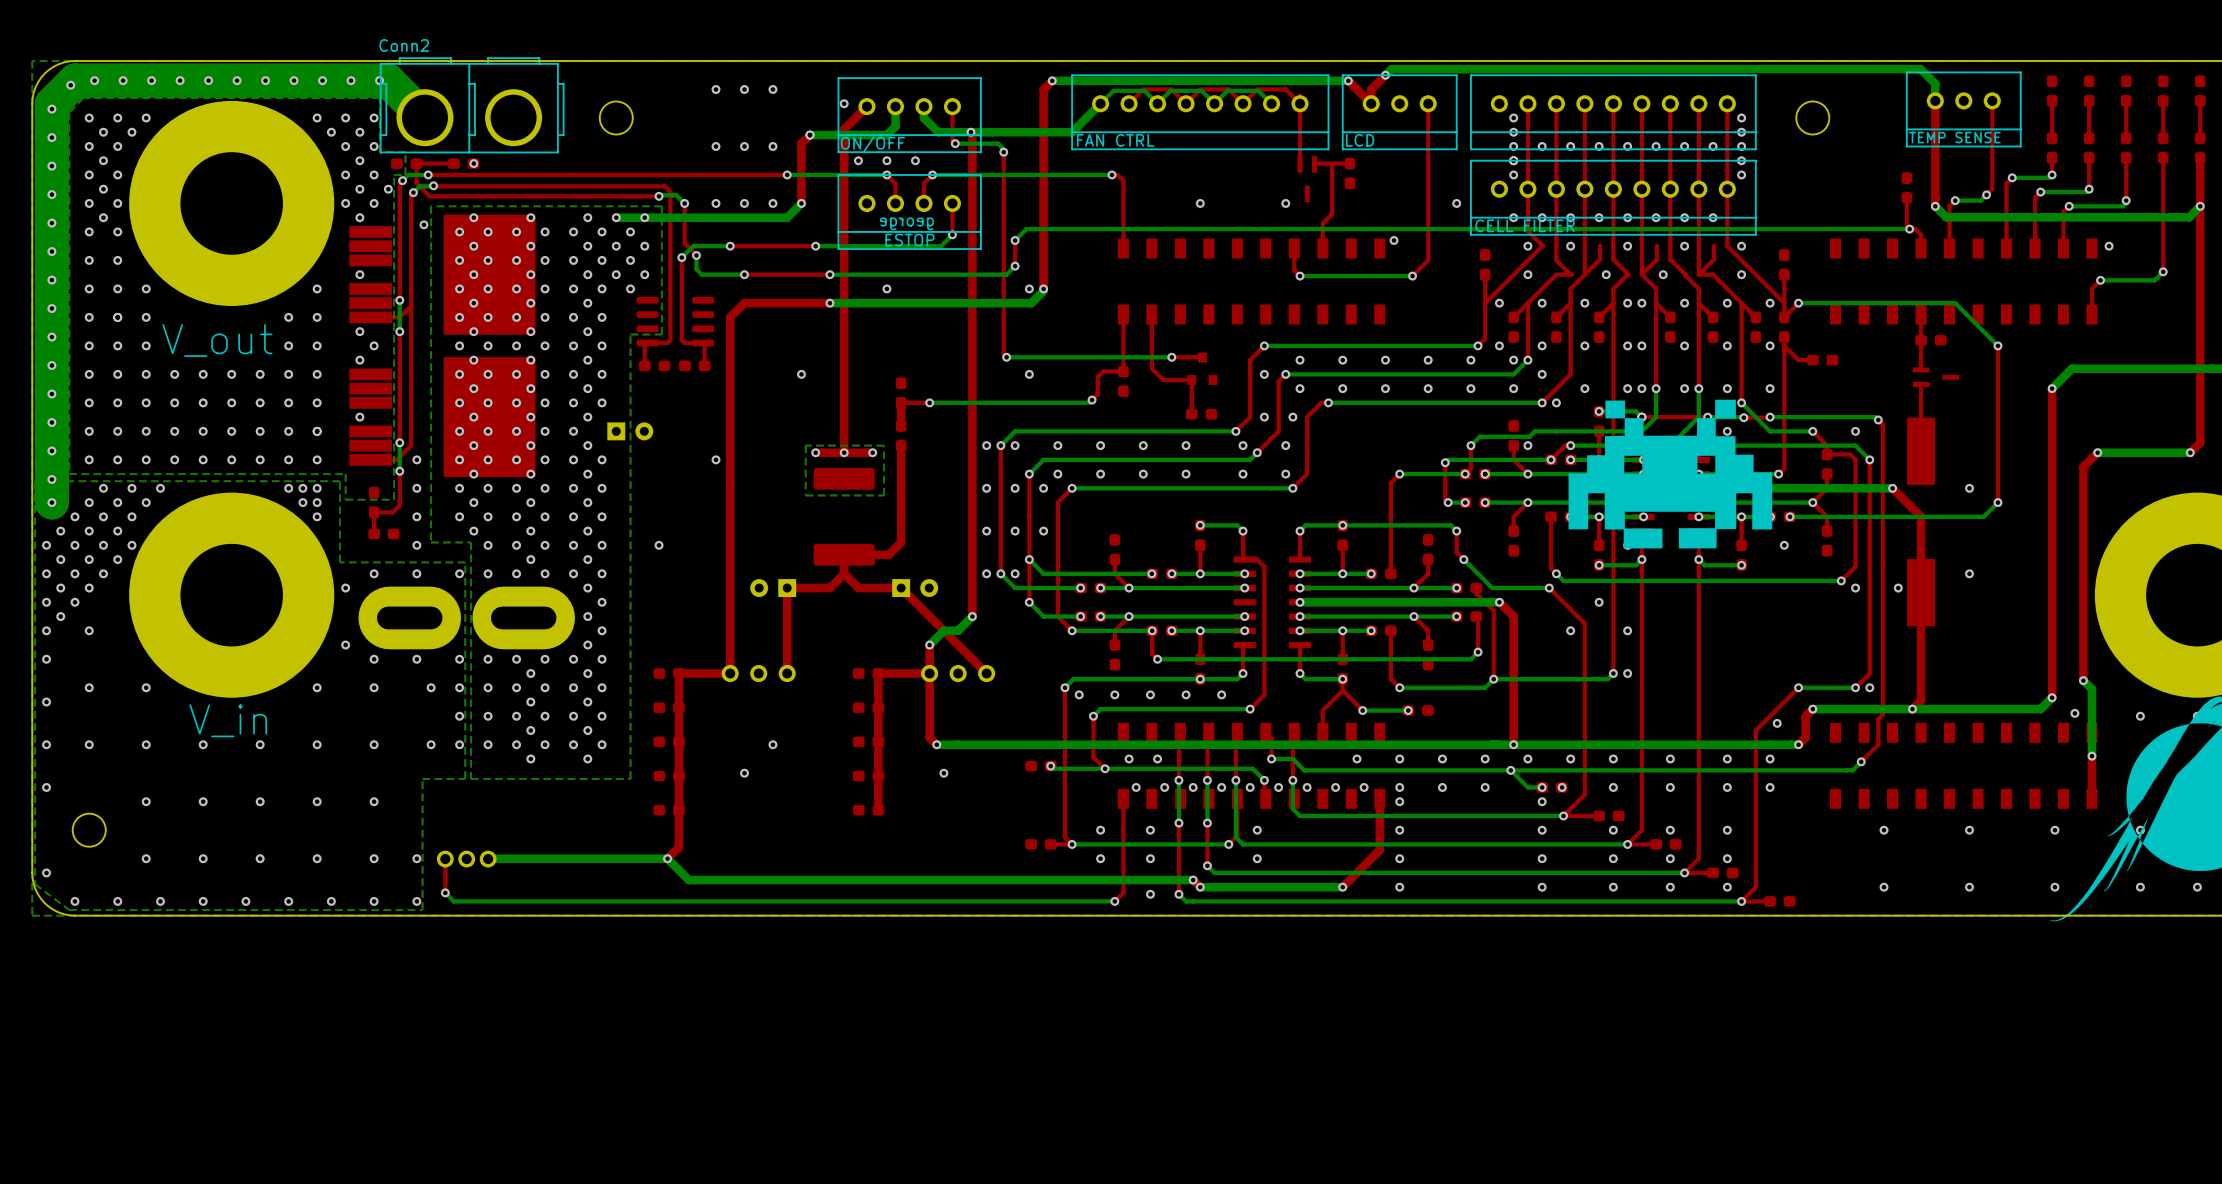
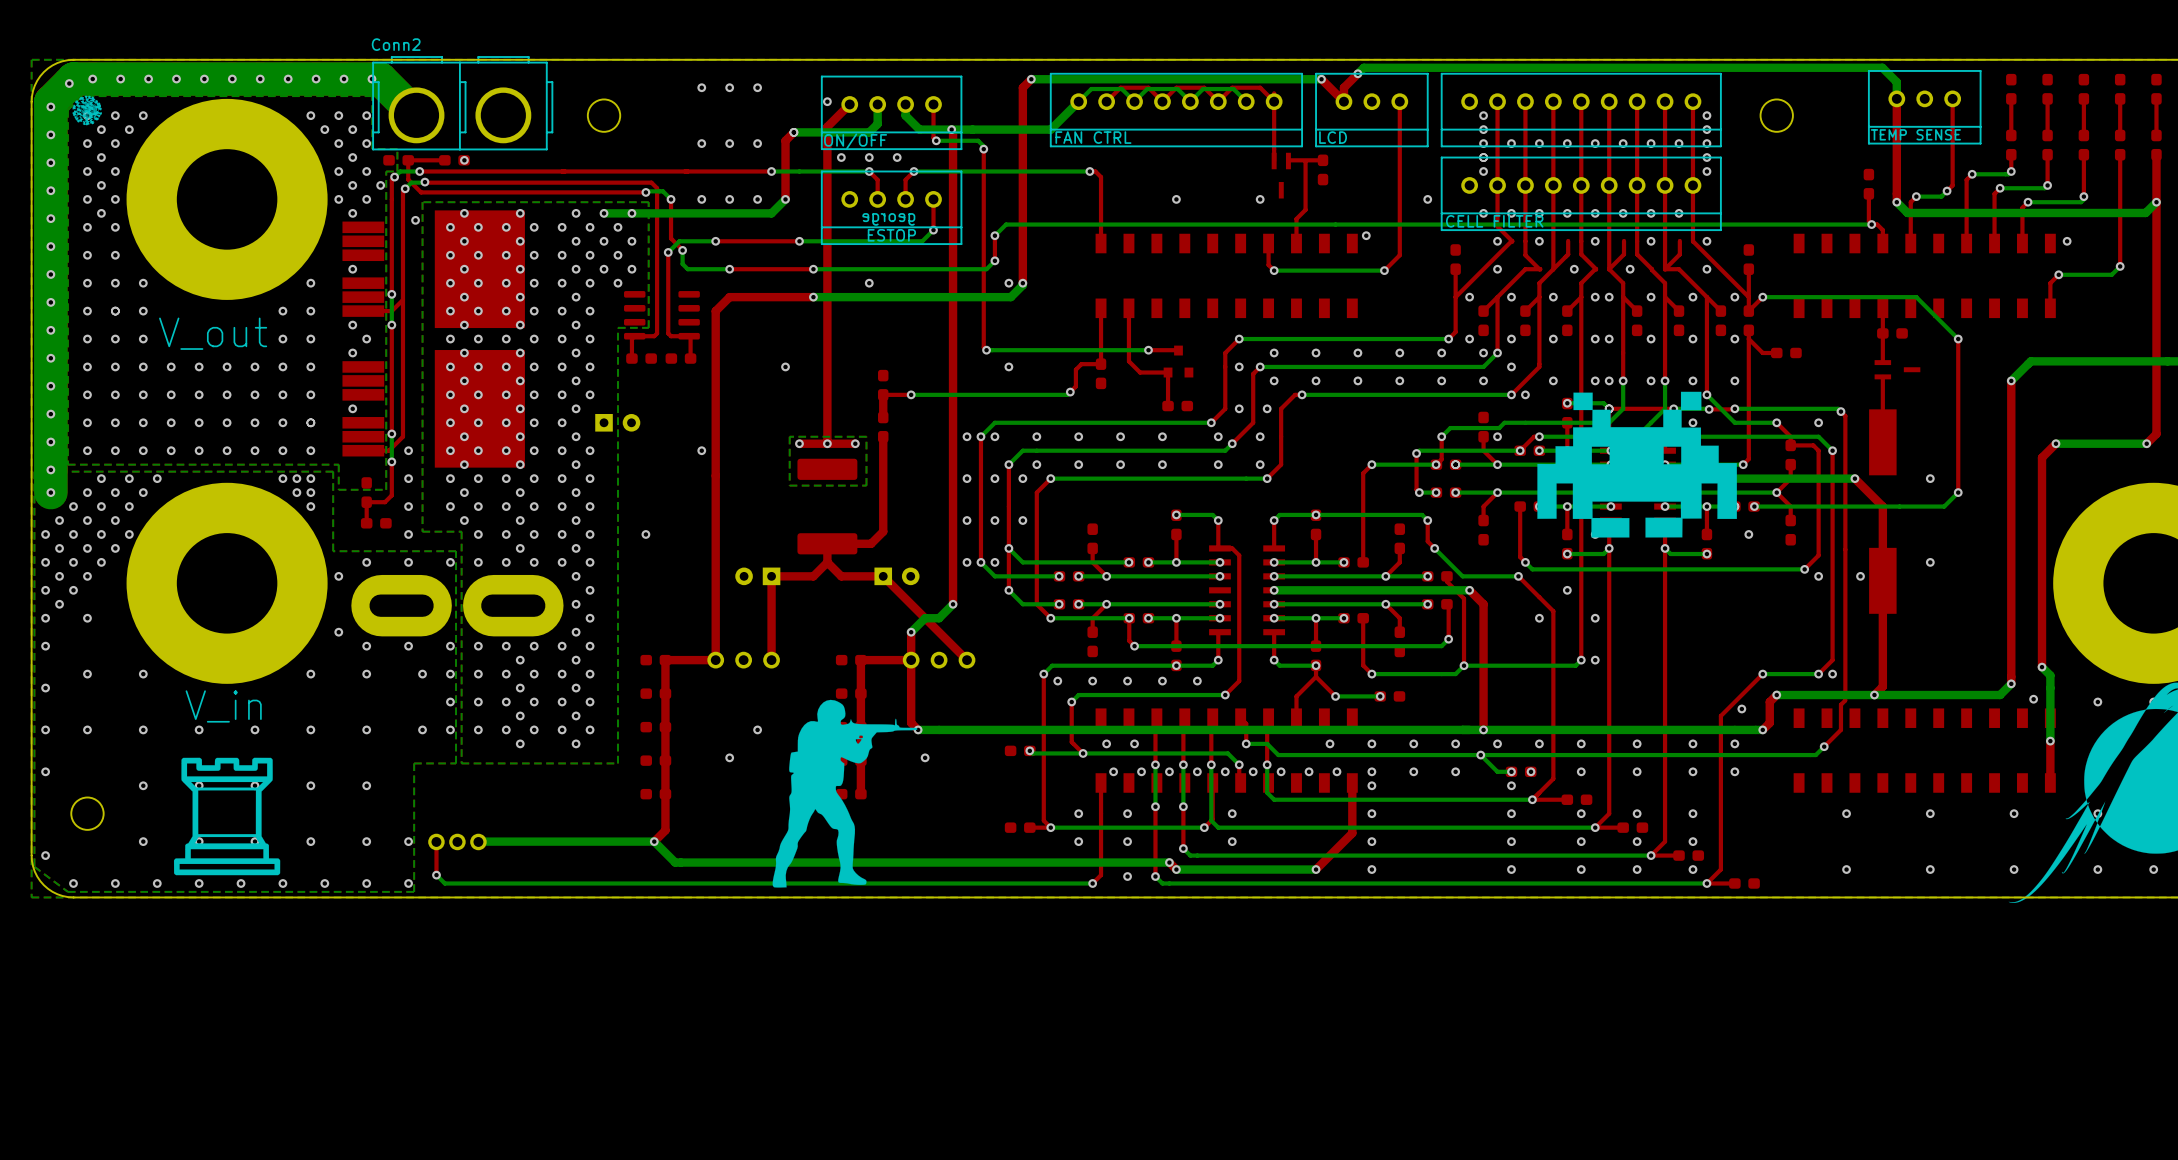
drawing: none -> [72, 95, 103, 126]
drawing: none -> [772, 699, 918, 888]
drawing: none -> [173, 757, 281, 876]

